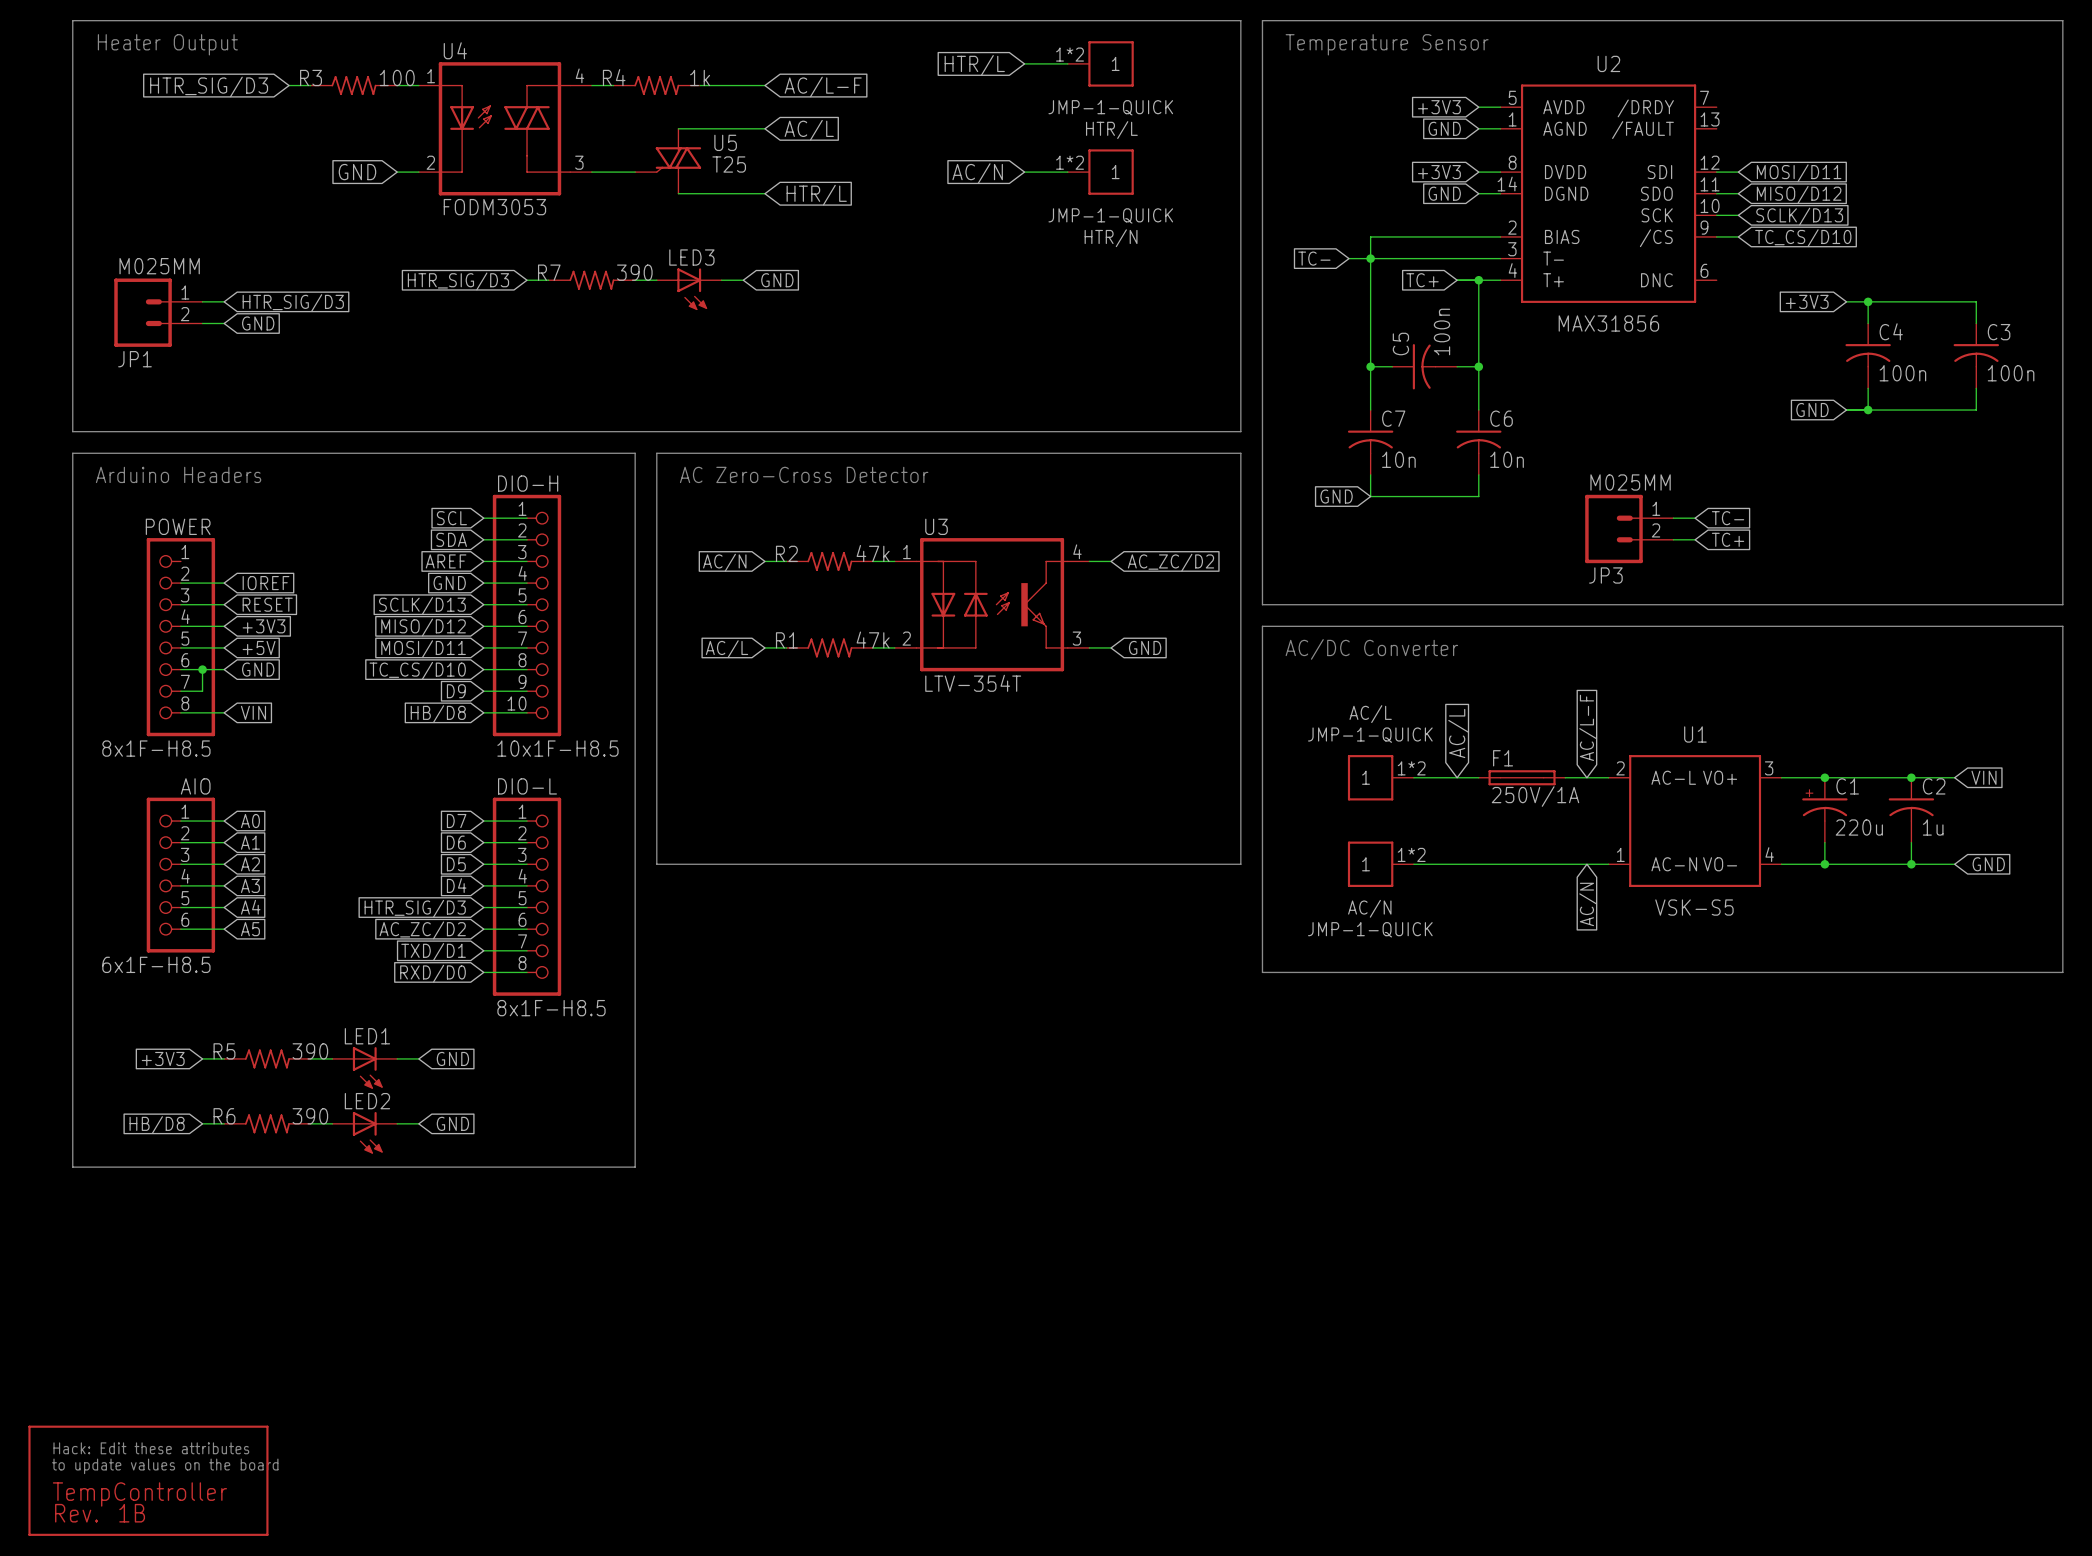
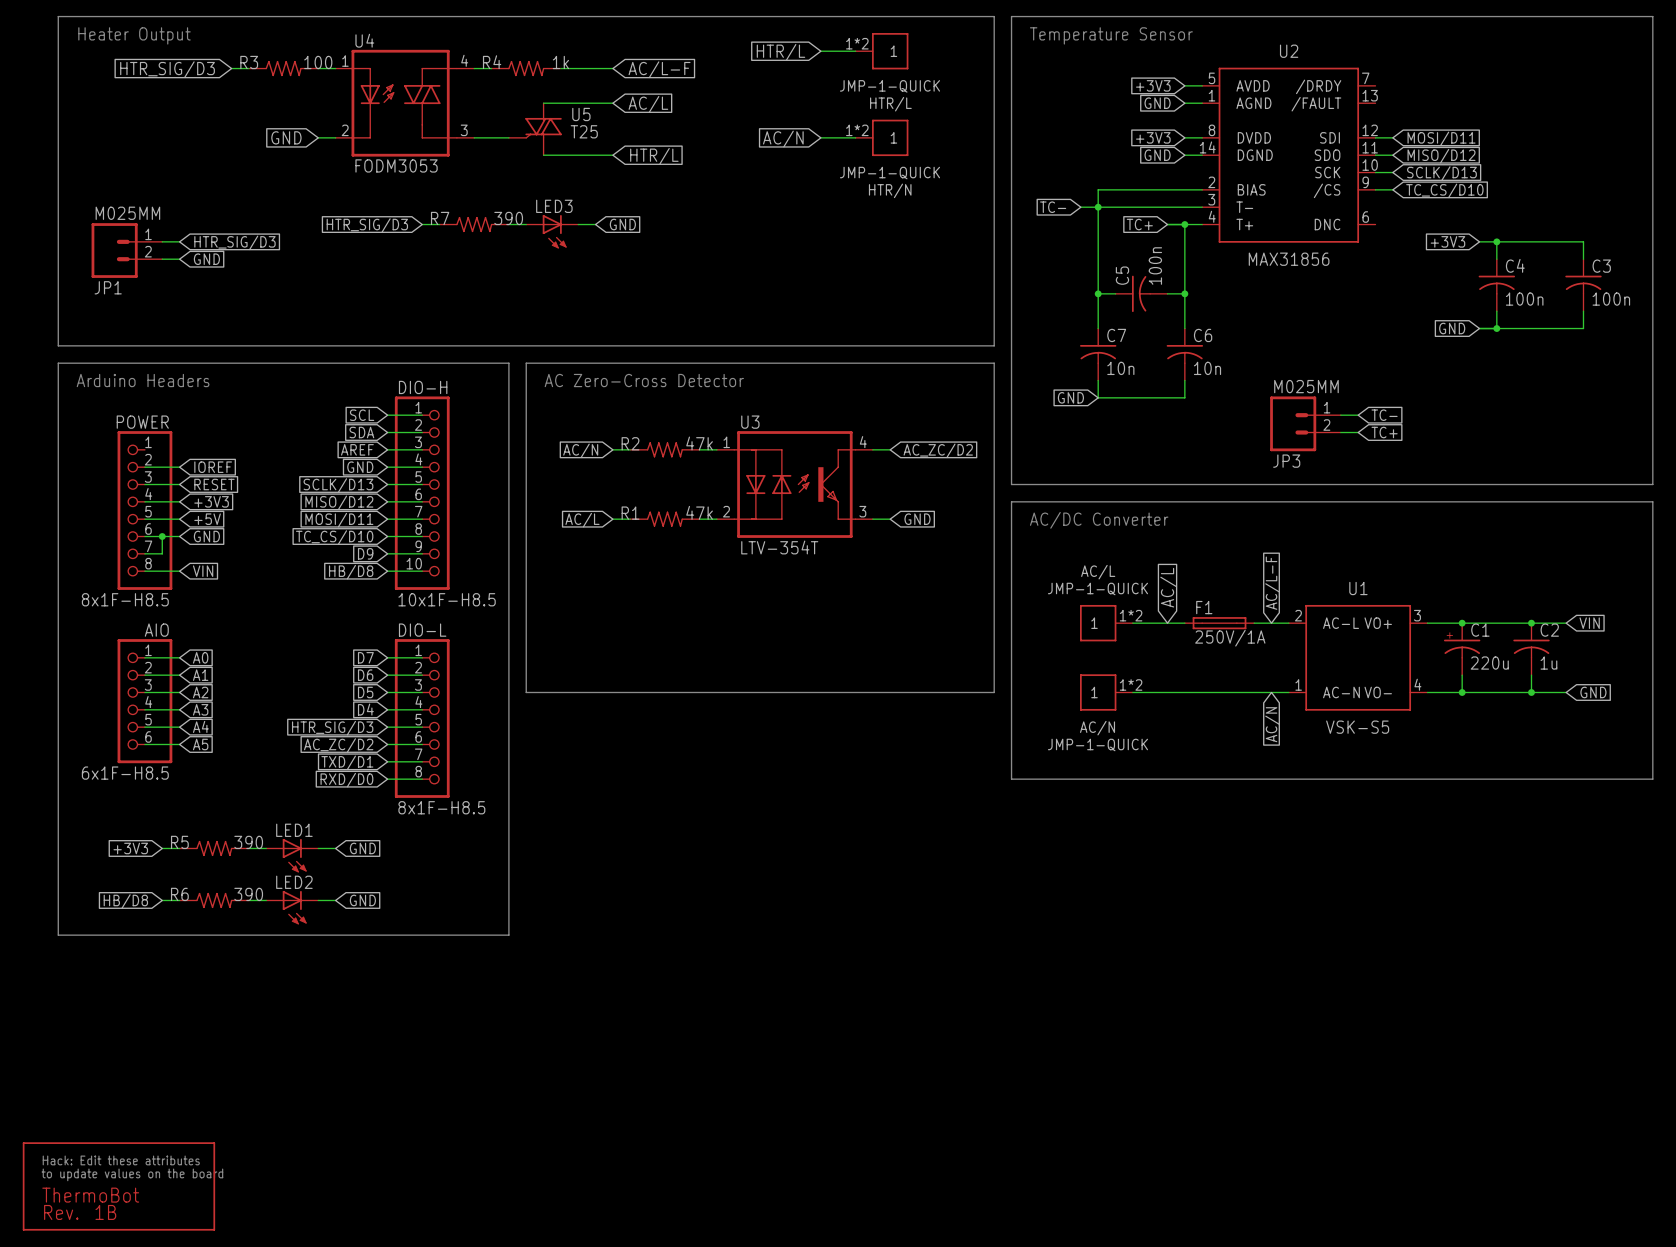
part text: TempController (139, 1494) -> ThermoBot (90, 1195)

